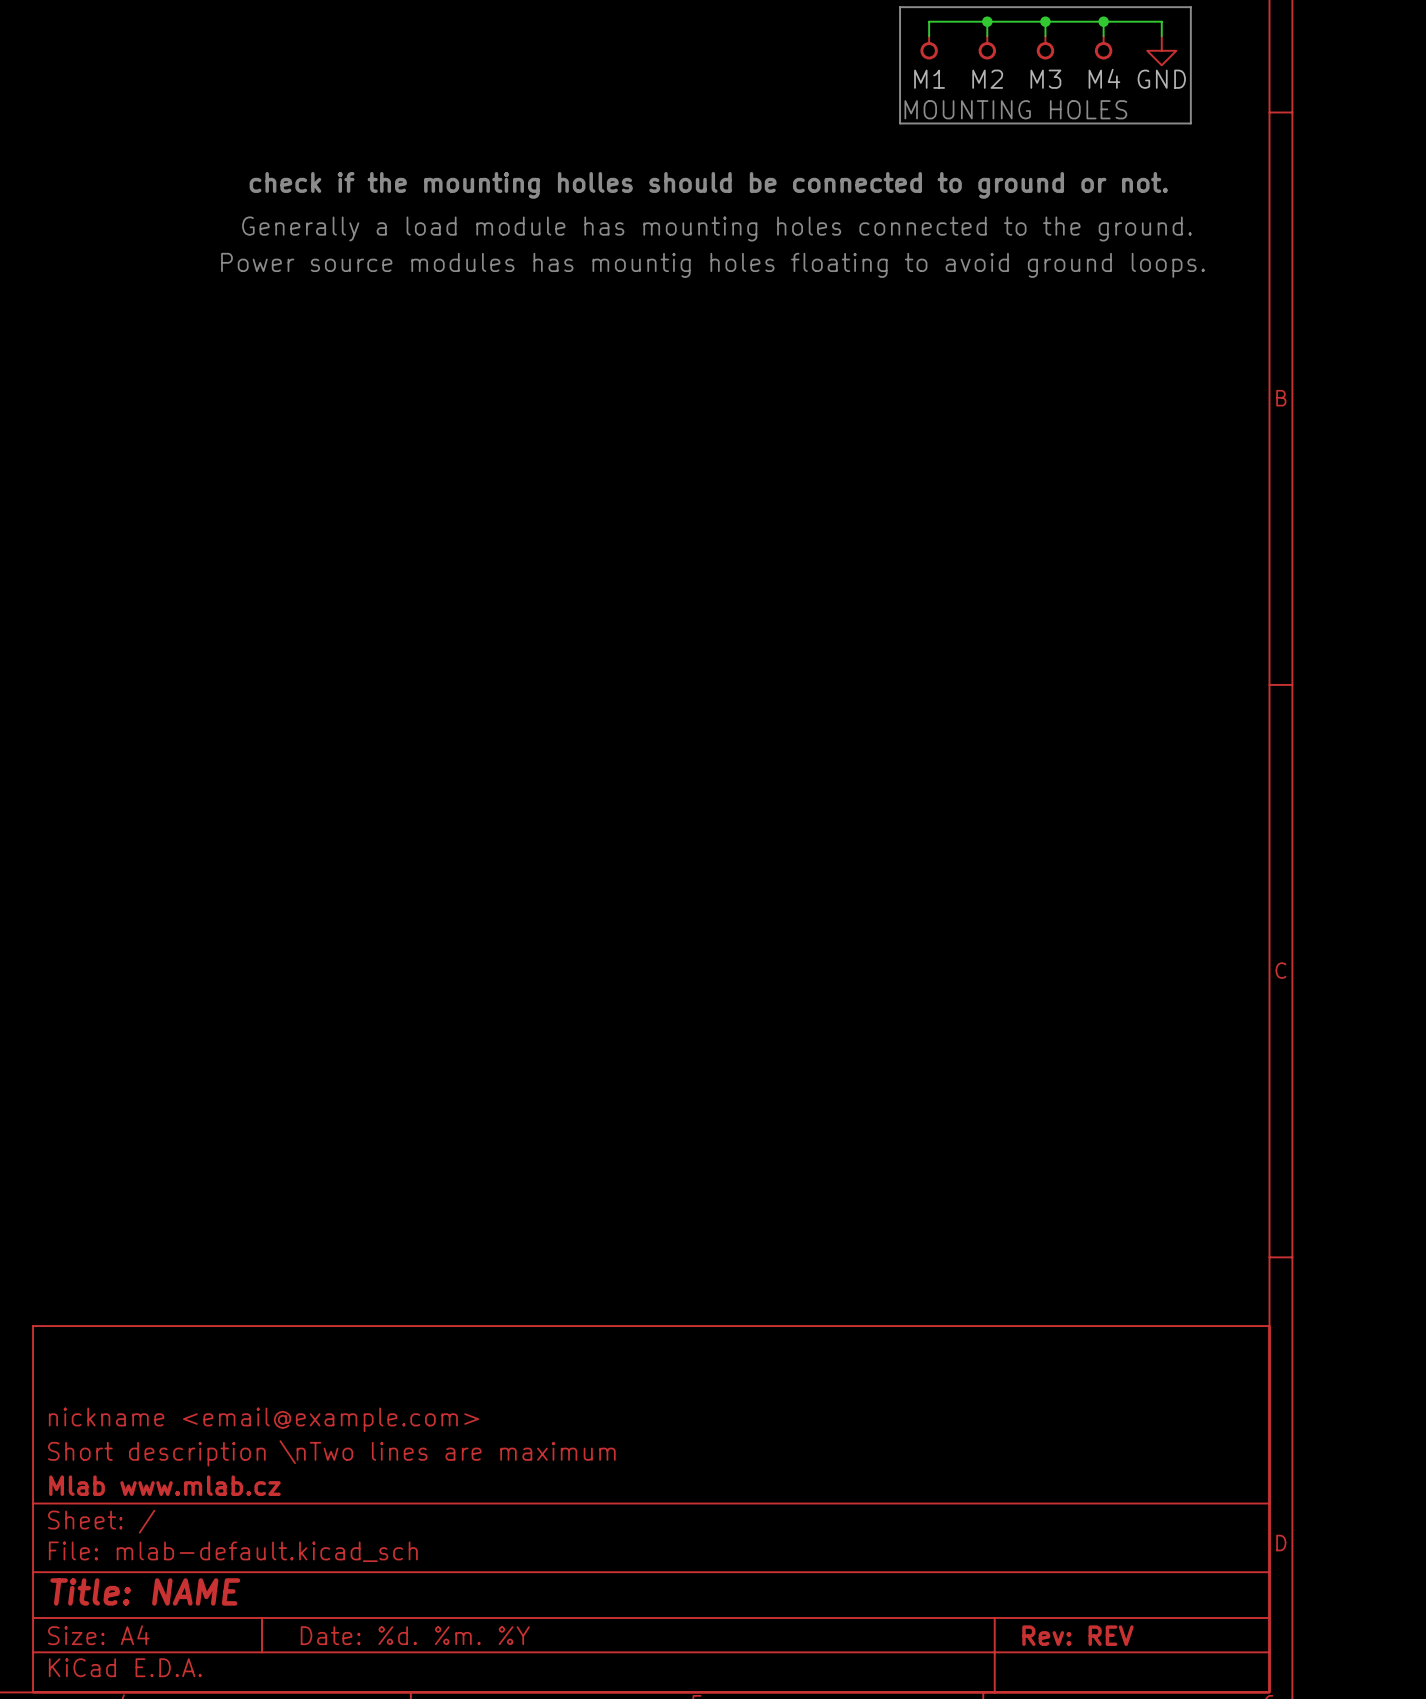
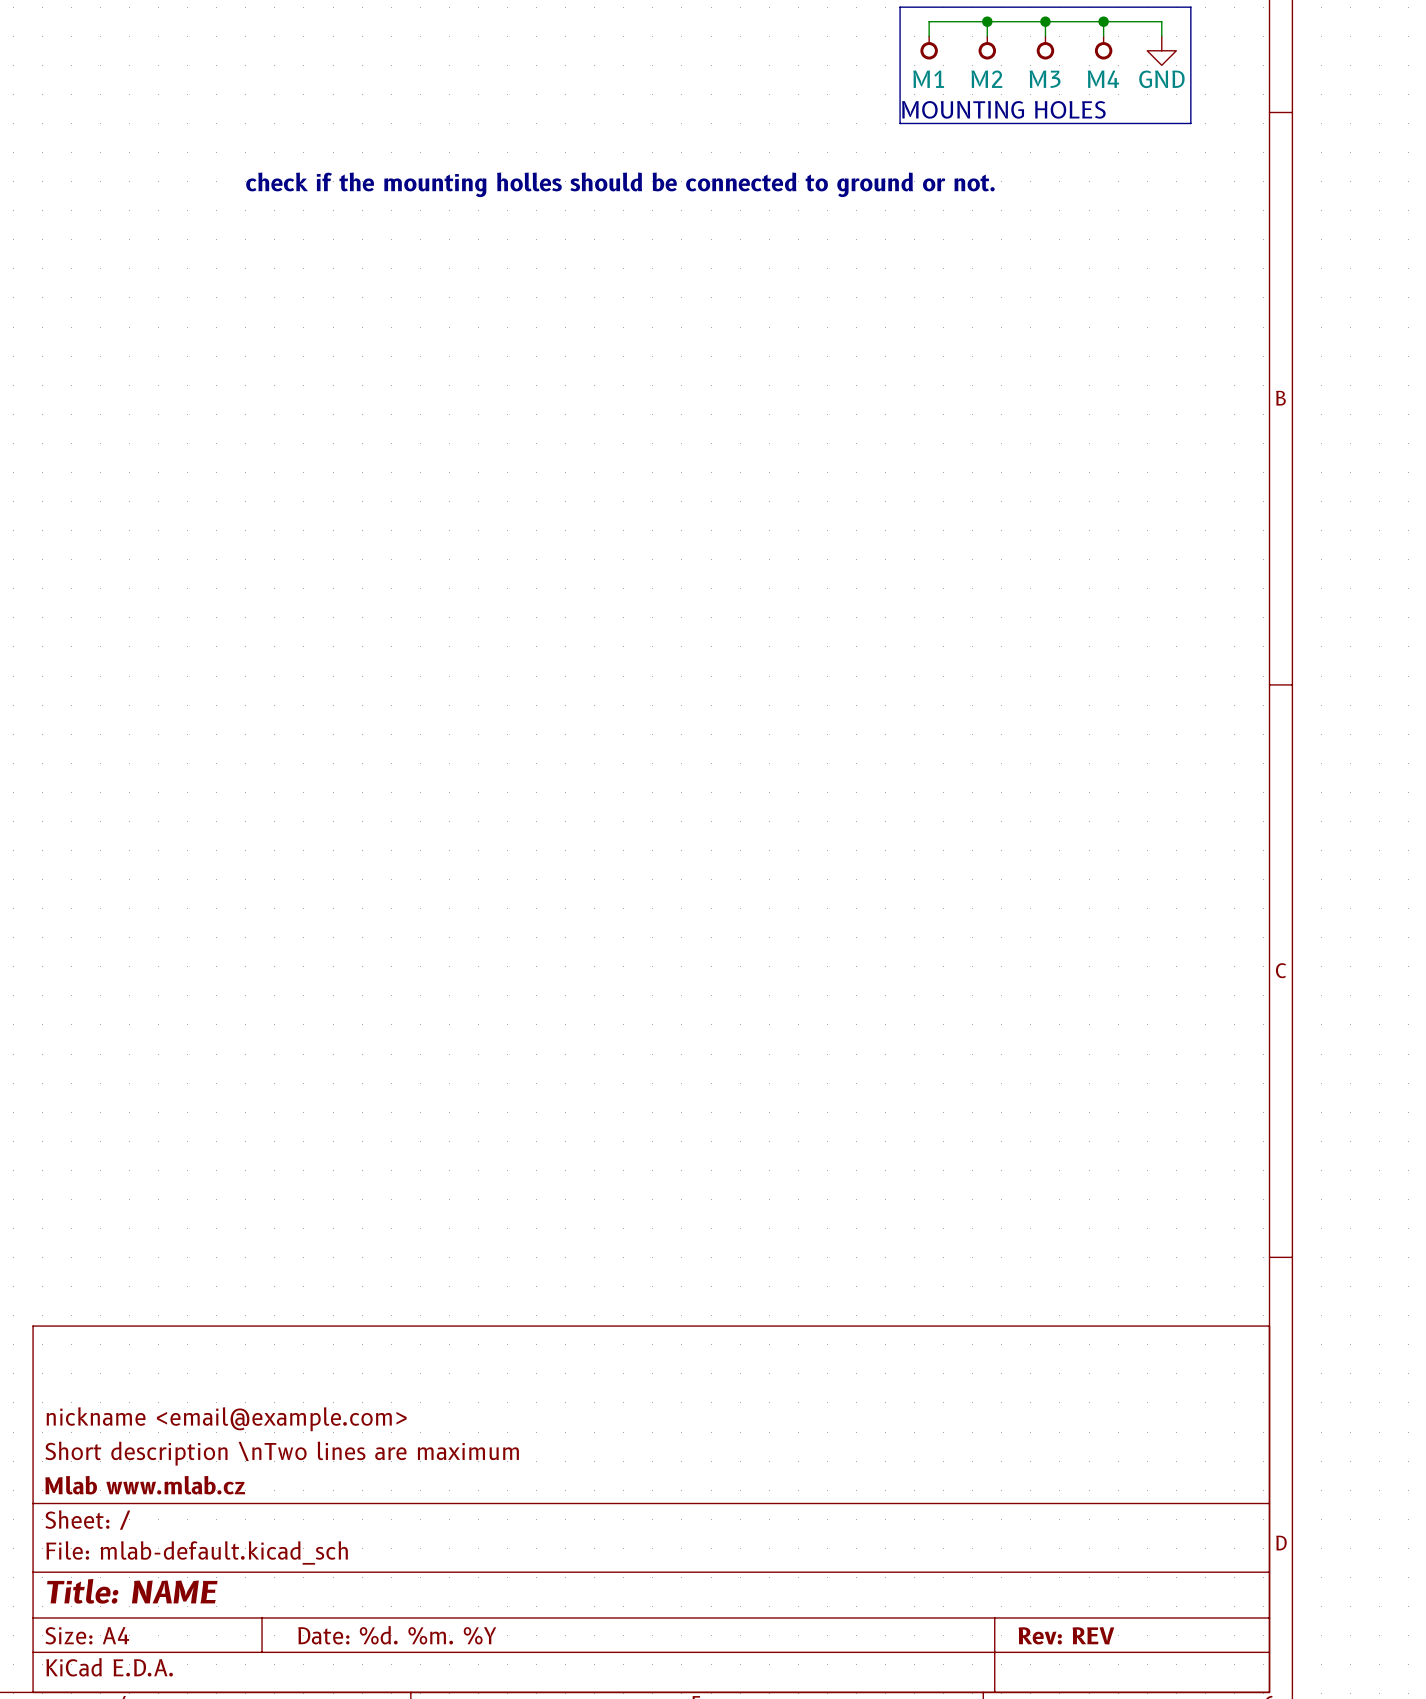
text: Generally a load module has mounting holes connected to the ground. (716, 228) -> none
text: Power source modules has mountig holes floating to avoid ground loops. (713, 265) -> none

